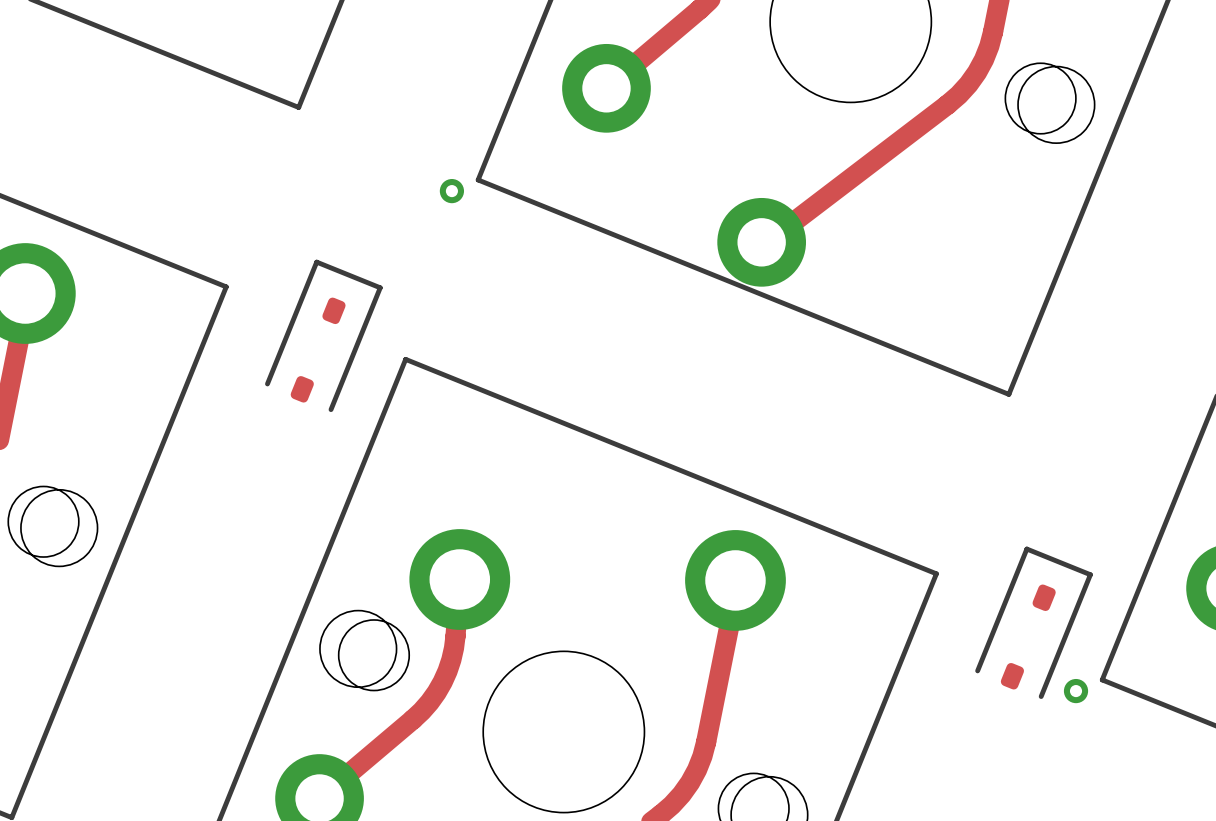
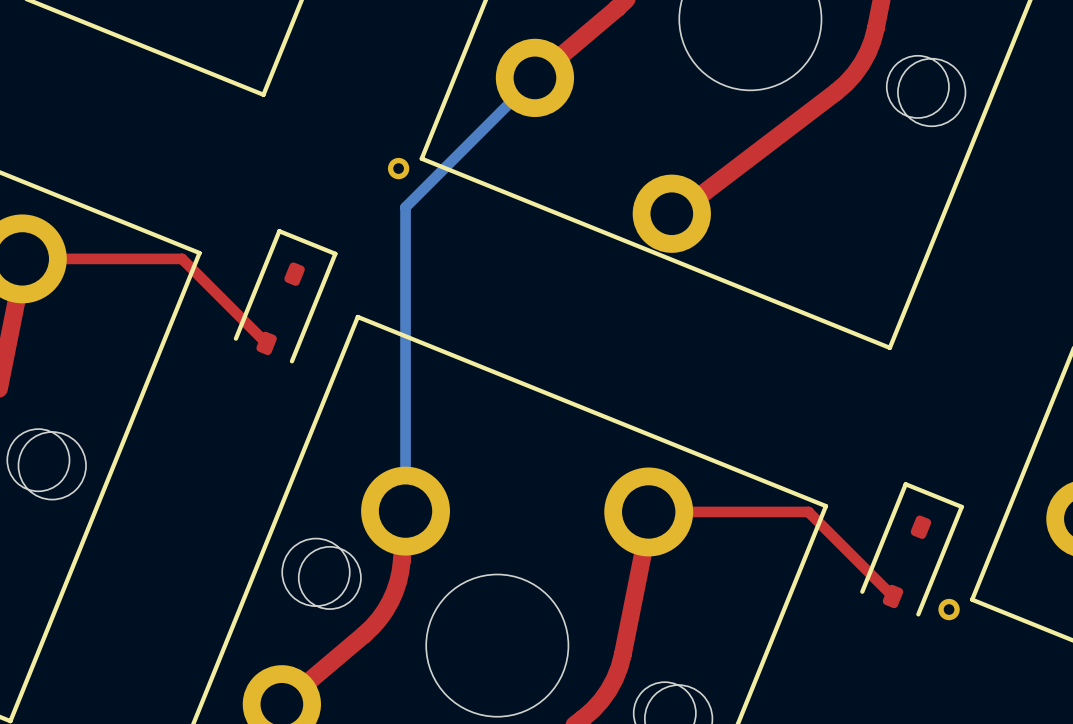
bottom track: none -> (534, 77) (405, 207) (405, 511)
top track: none -> (22, 258) (182, 258) (266, 343)
top track: none -> (648, 511) (808, 511) (892, 596)

